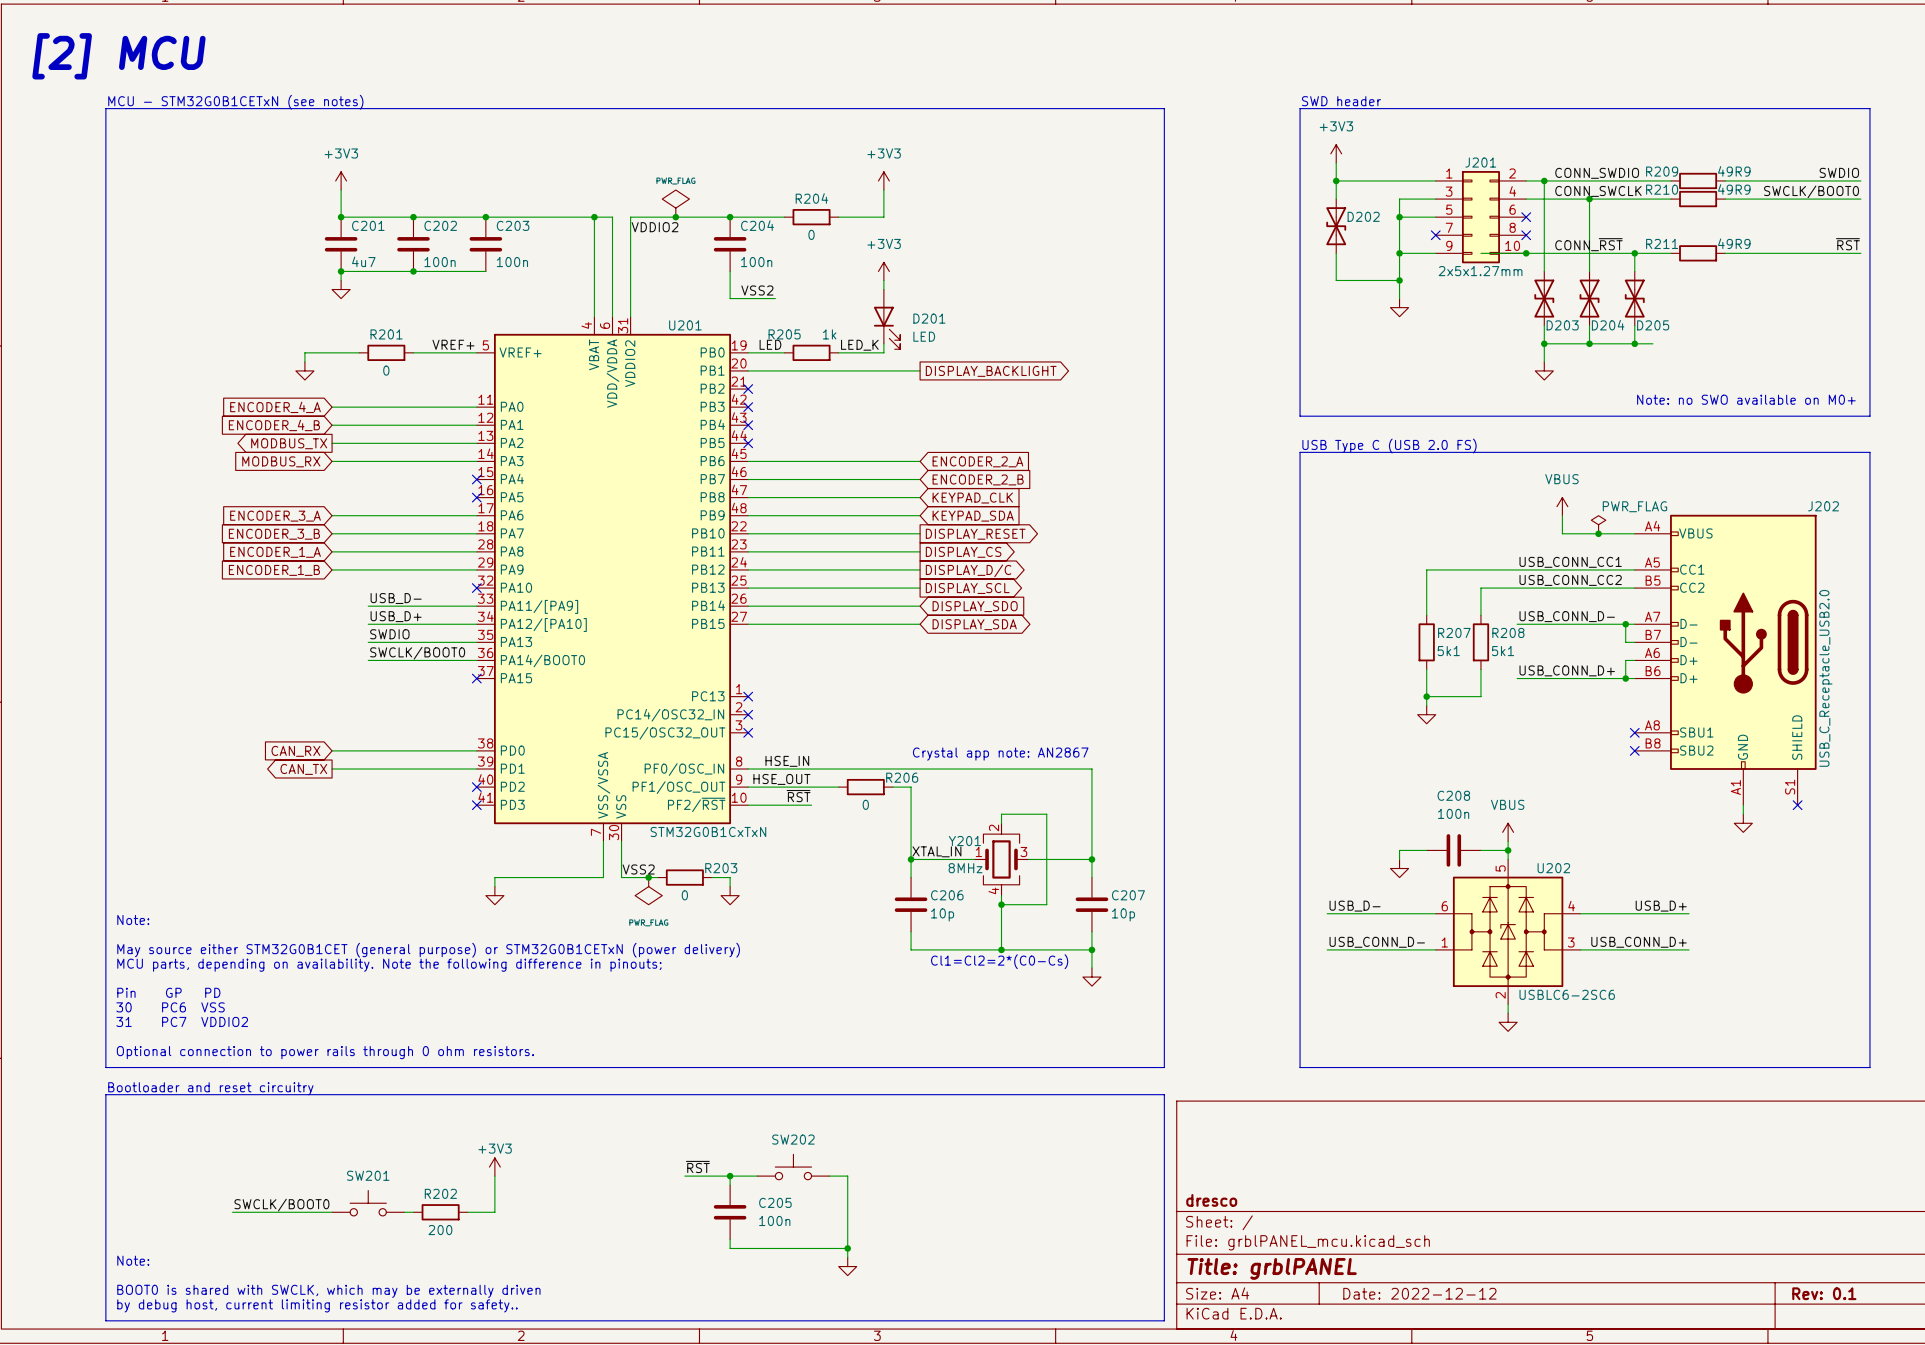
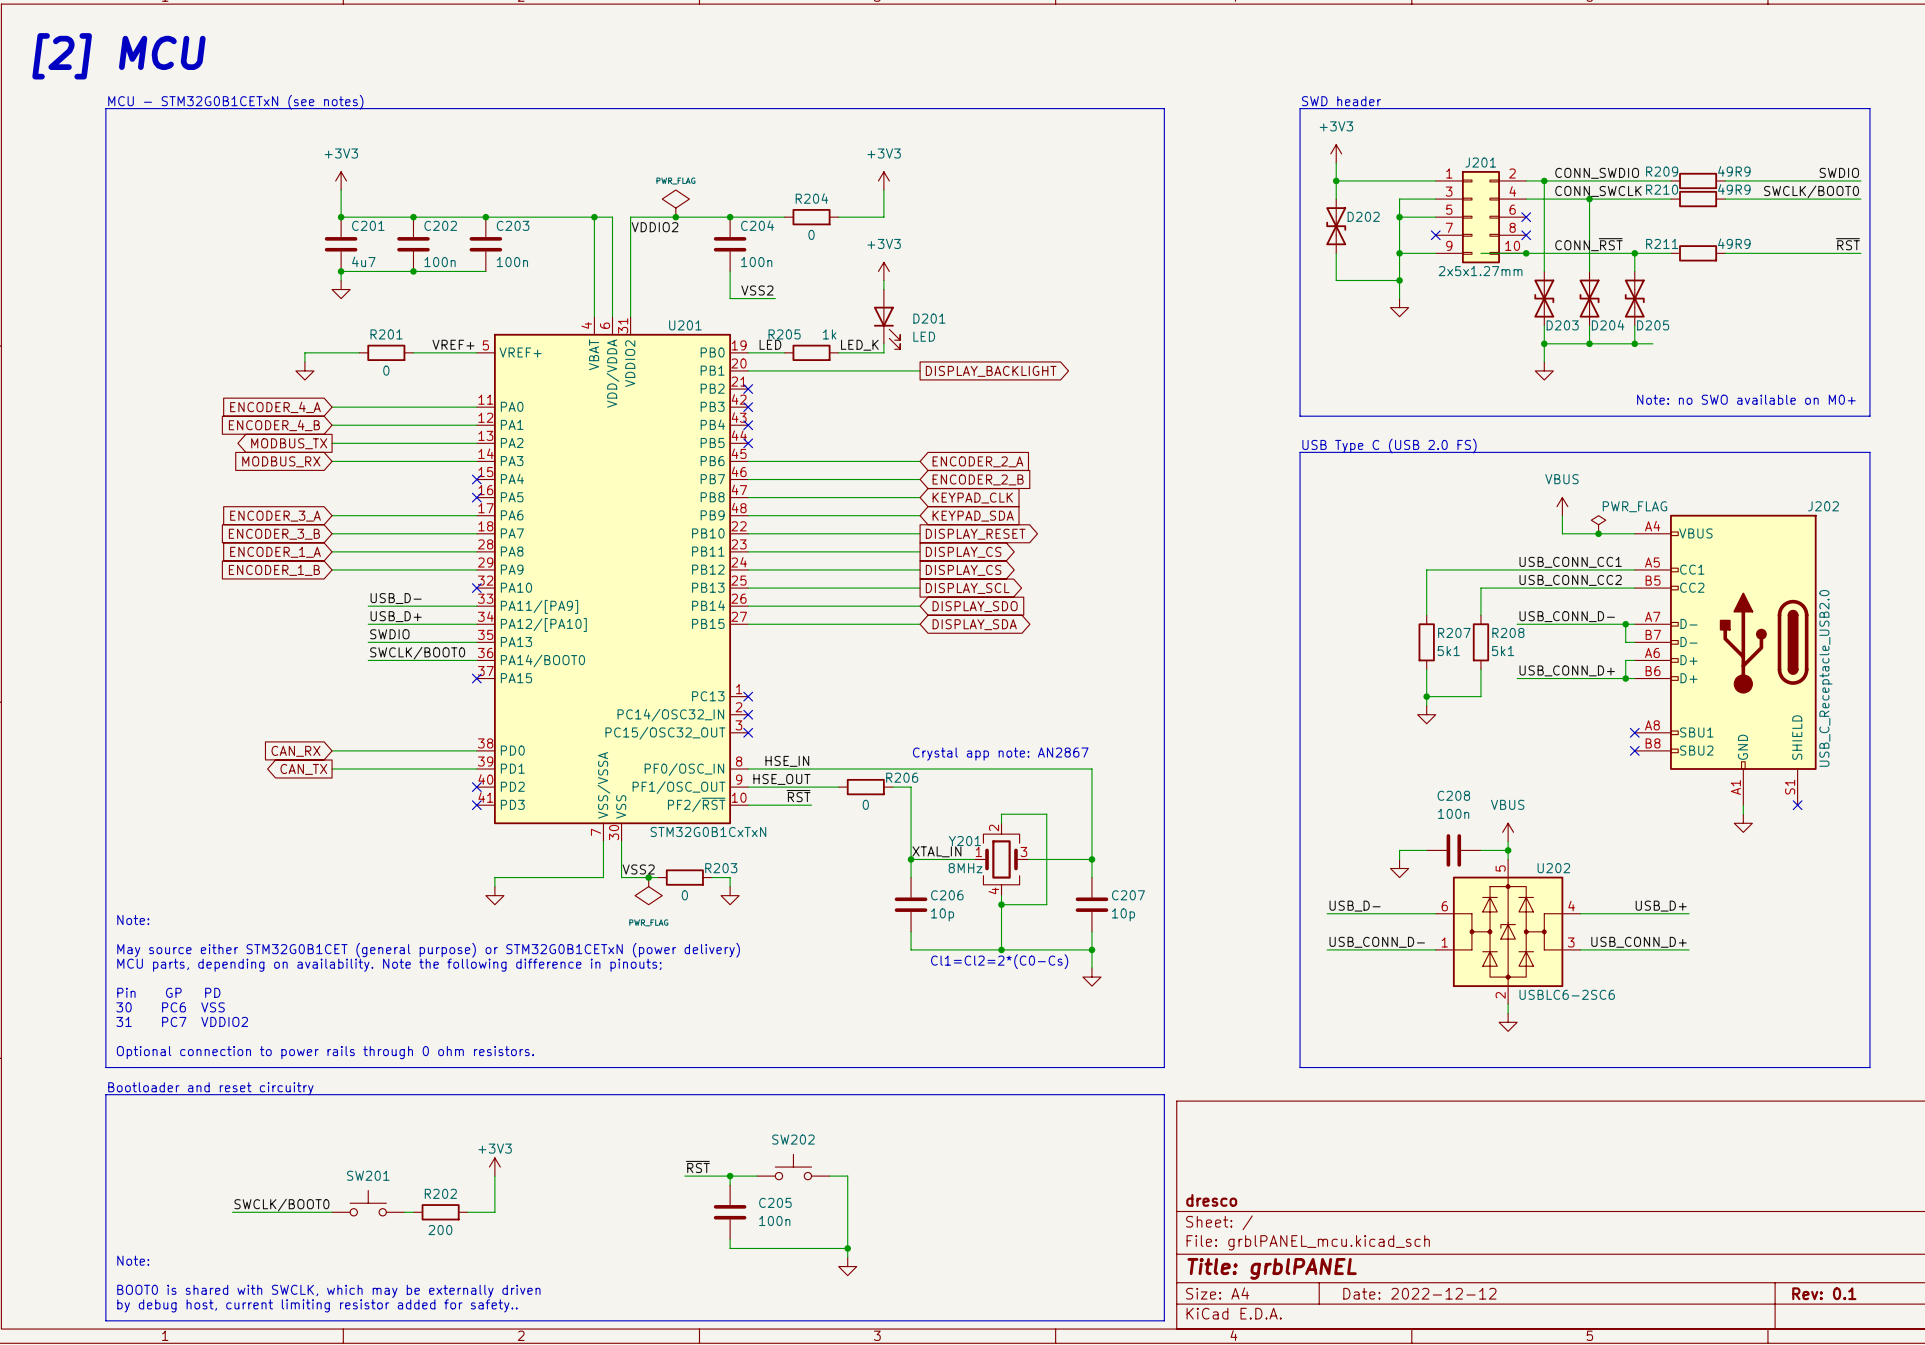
global label: DISPLAY_D/C (968, 570) -> DISPLAY_CS (963, 570)

